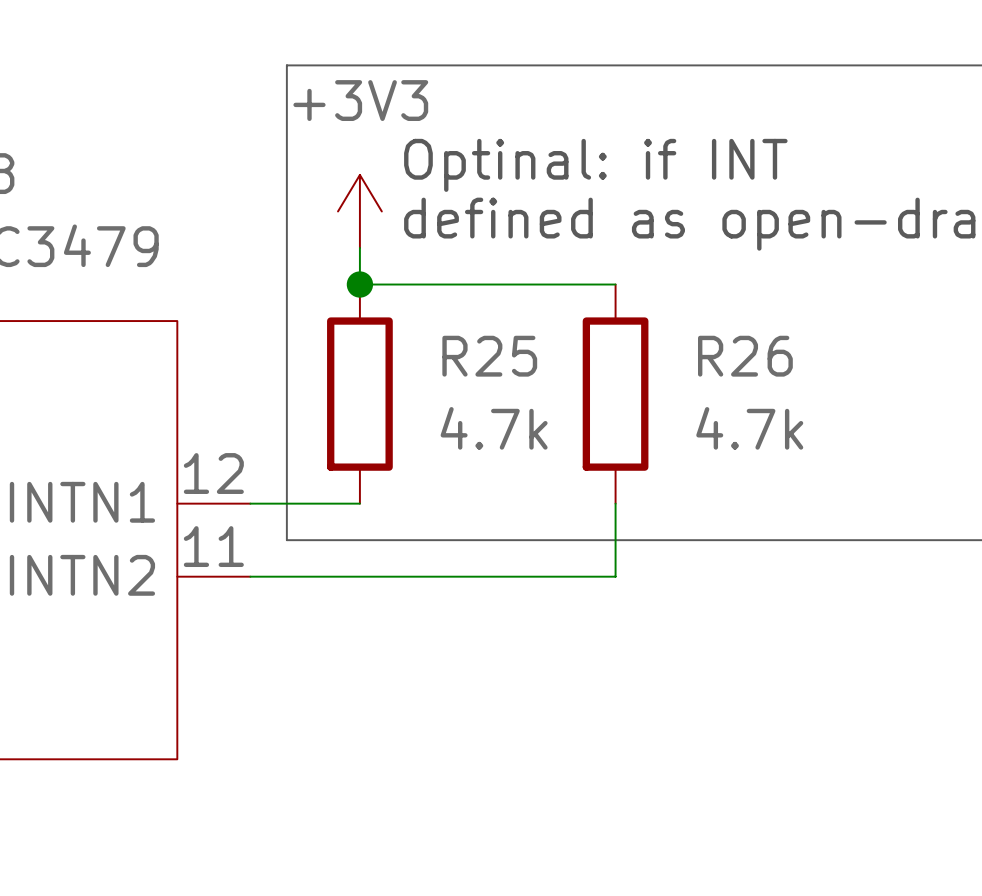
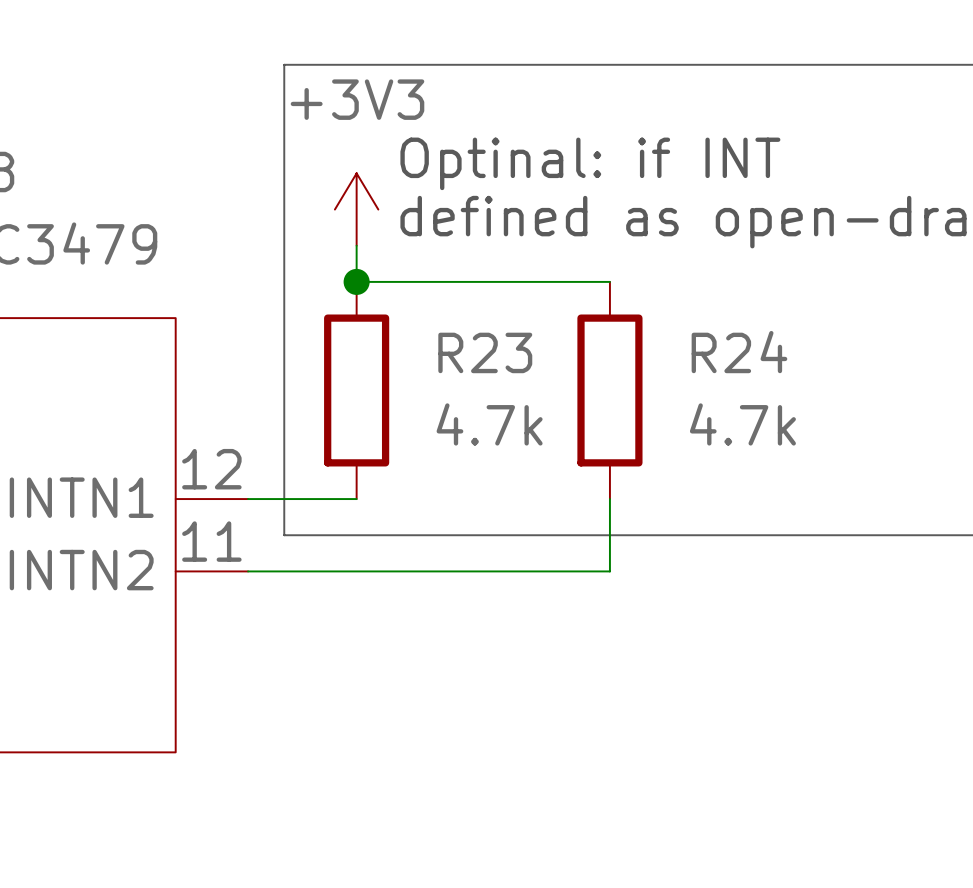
R25 name: R25 (489, 356) -> R23 (485, 352)
R26 name: R26 (745, 356) -> R24 (739, 352)

